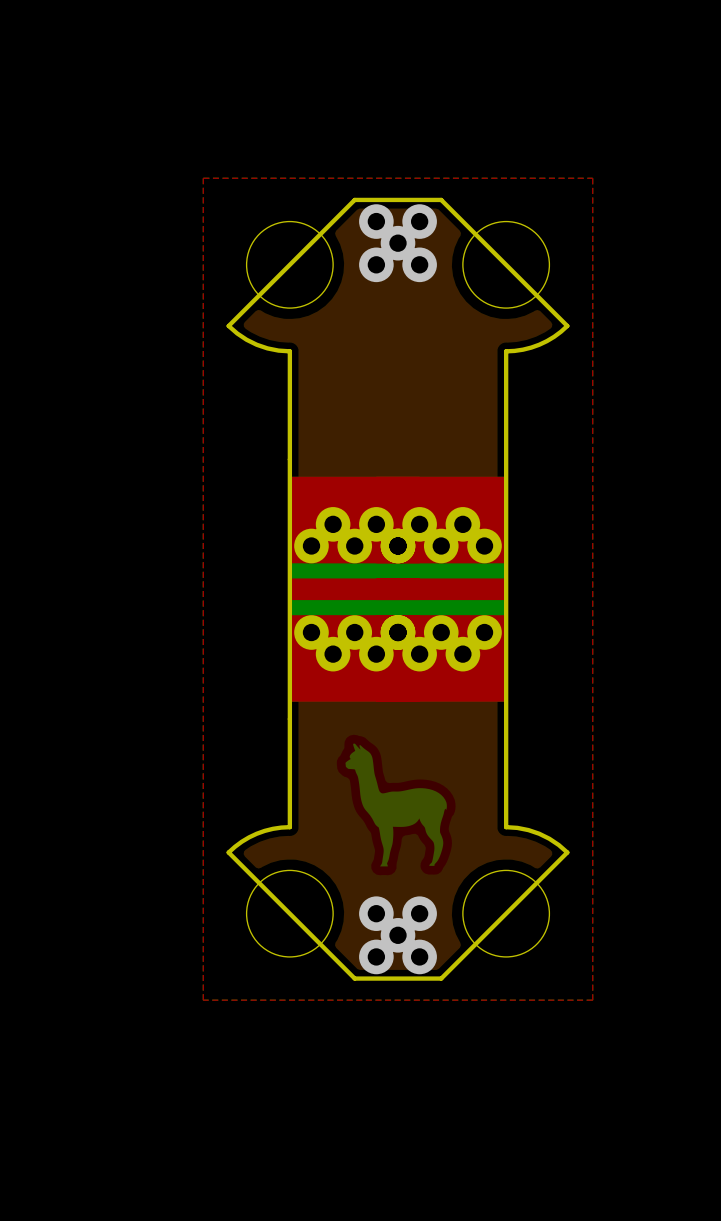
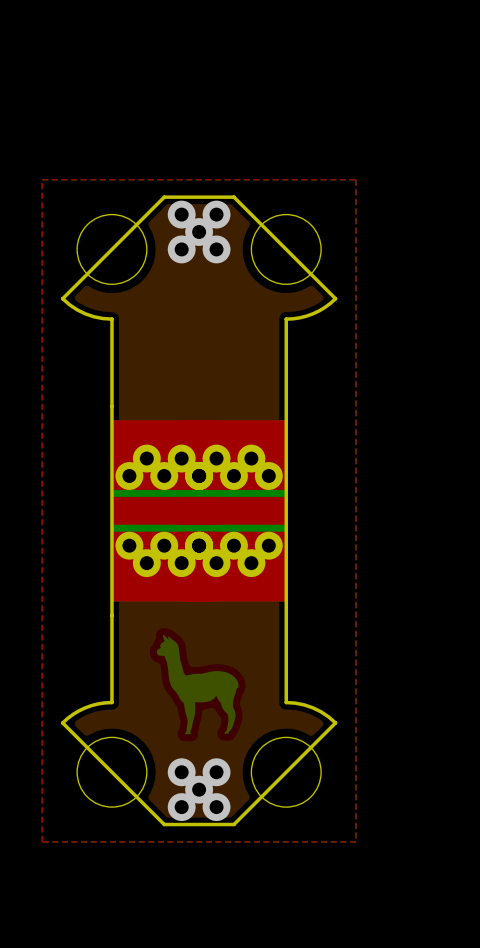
part footprint: [289, 476, 420, 702] -> [111, 420, 217, 602]
part footprint: [376, 476, 507, 702] -> [181, 420, 287, 602]

